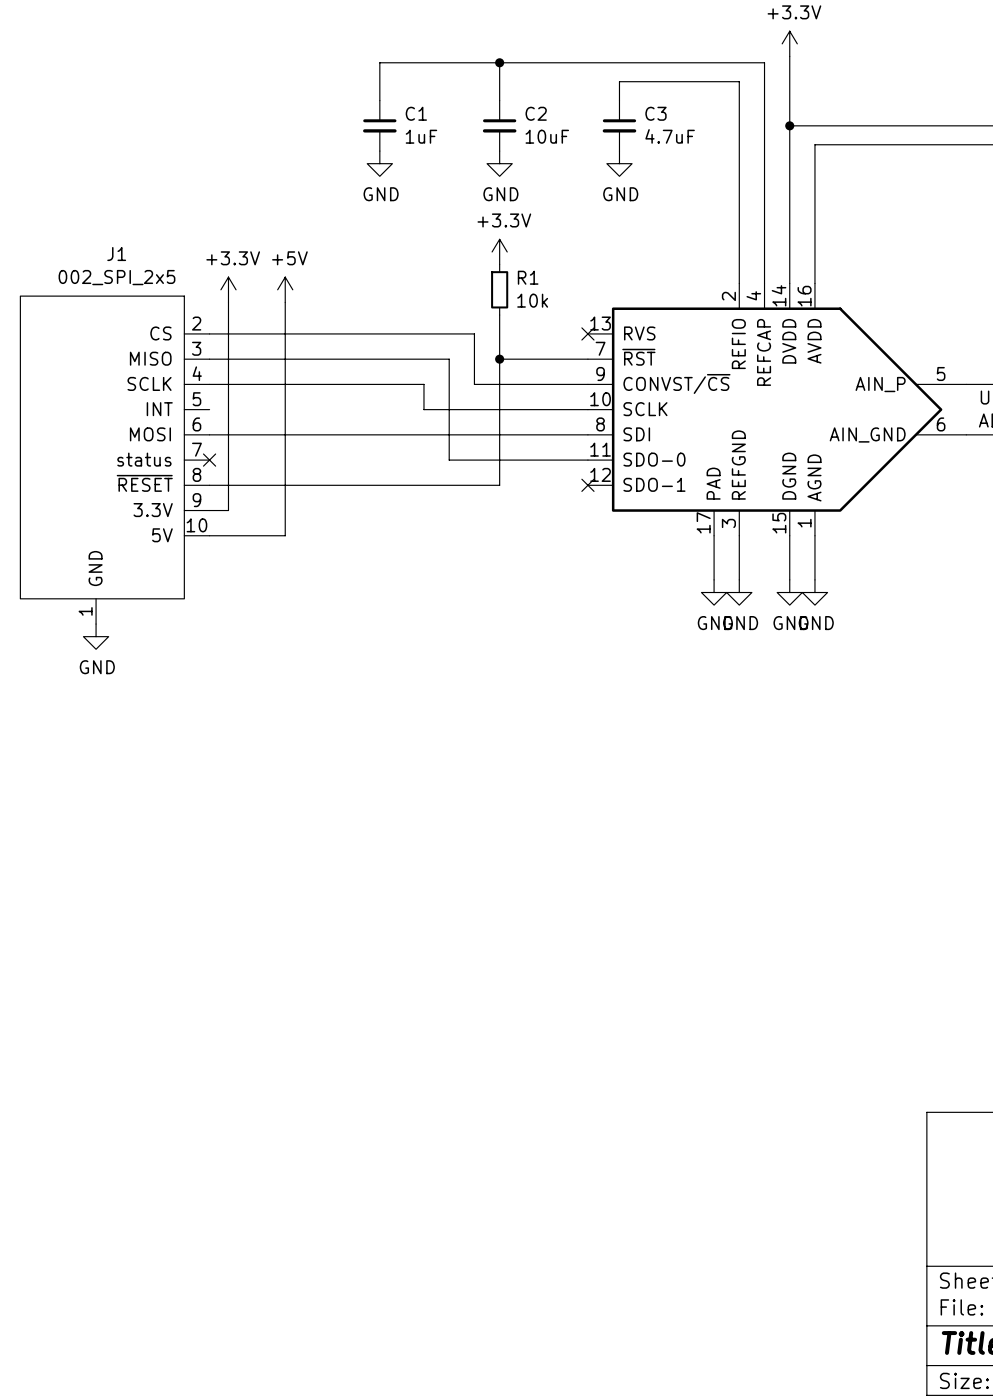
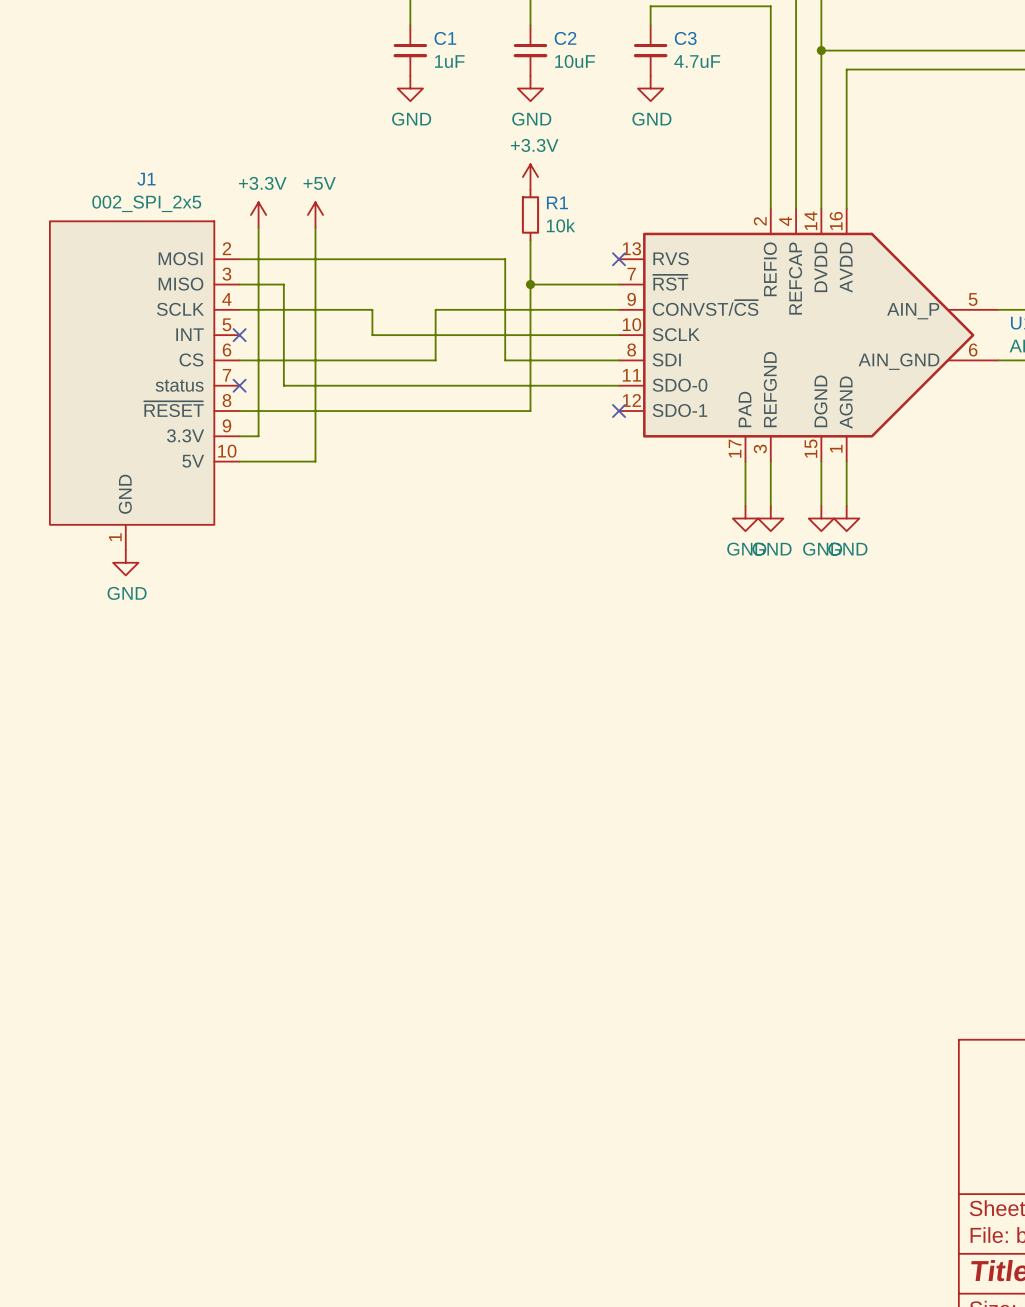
J1 pin name: CS (160, 333) -> MOSI (180, 258)
wire: (253, 359) (449, 359) (449, 460) -> (283, 284) (283, 385) (479, 385)
wire: (342, 384) (405, 384) -> (372, 309) (372, 335) (454, 335)
wire: none -> (435, 309) (435, 360)
wire: (423, 384) (423, 409) -> none
no-connect mark: none -> (239, 335)
J1 pin name: MOSI (150, 434) -> CS (191, 359)
wire: (405, 434) (474, 434) -> (454, 309) (505, 309) (505, 360)

